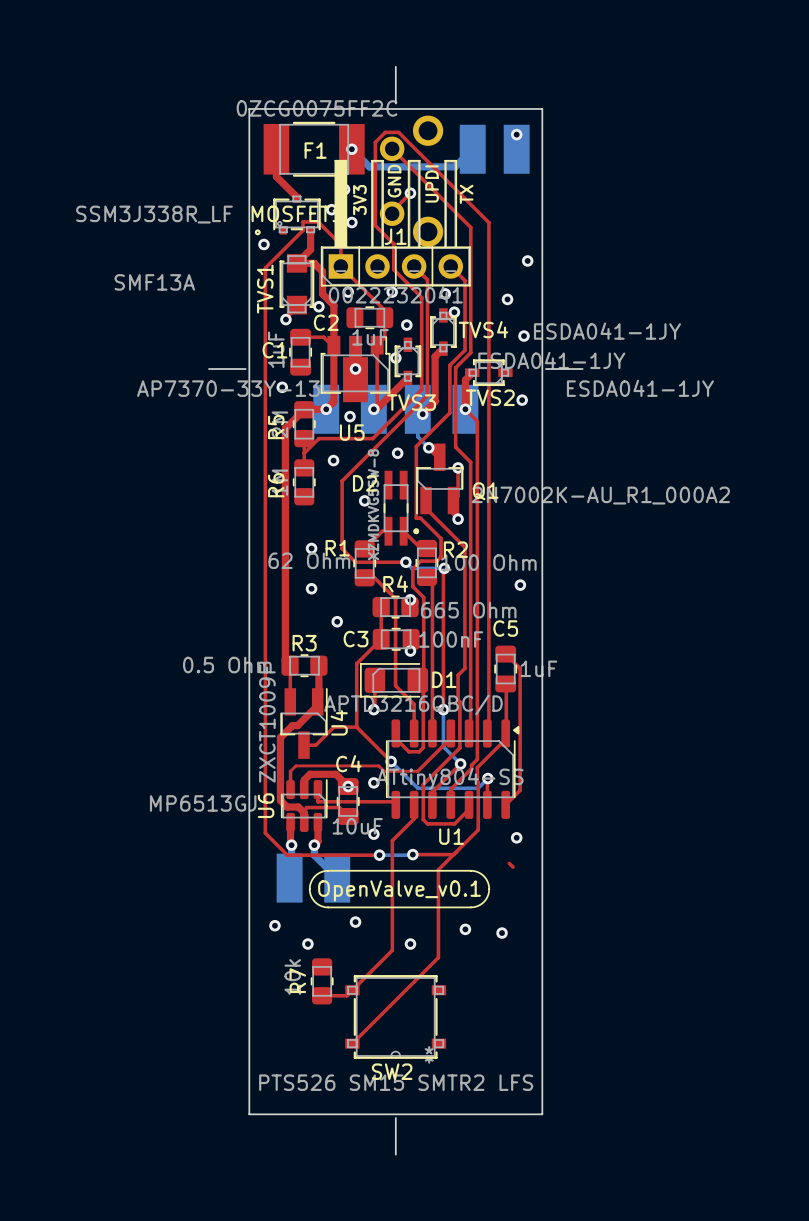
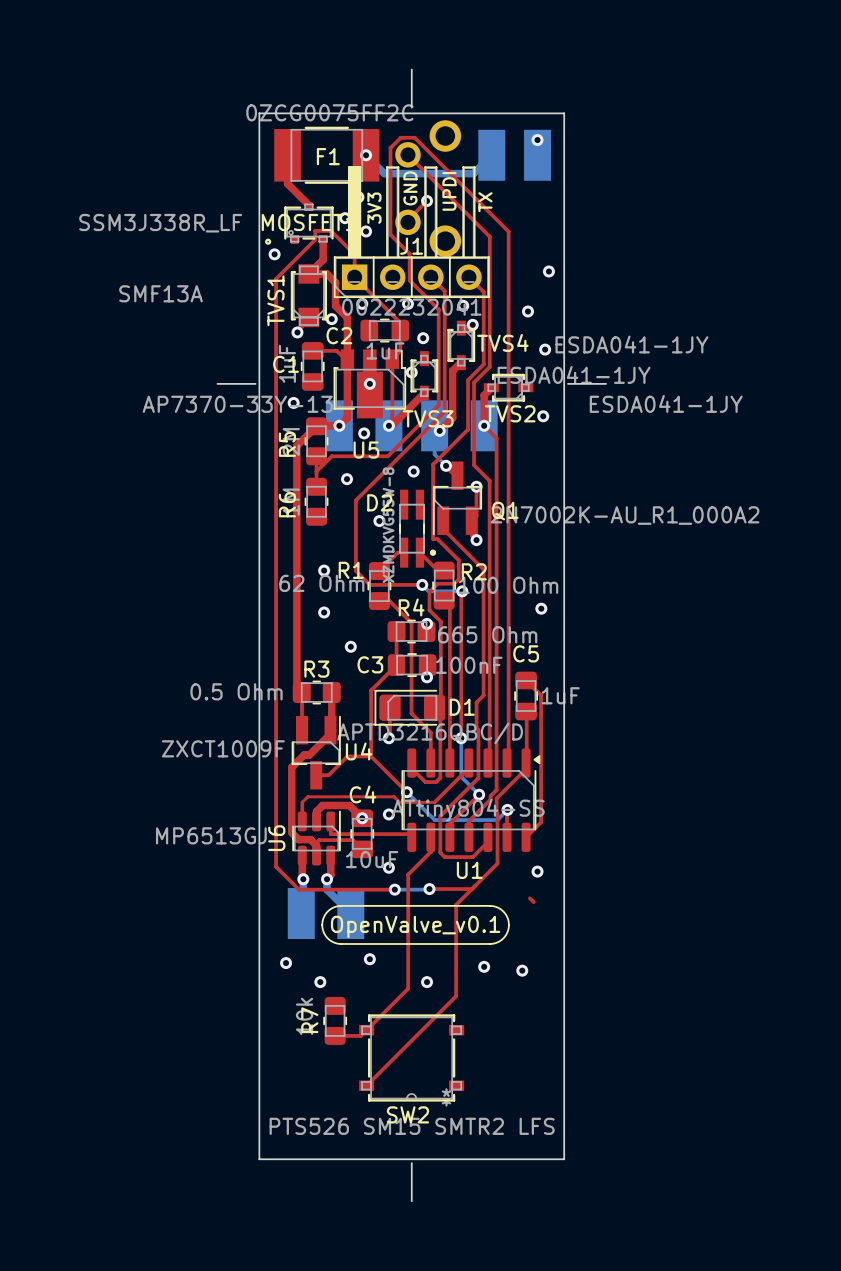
U4 name rotation: 0° (339, 722) -> 90° clockwise (359, 751)
U4 value rotation: 0° (267, 723) -> 90° clockwise (223, 748)

